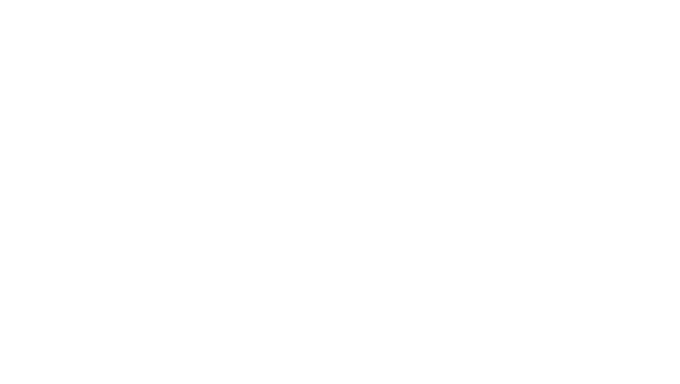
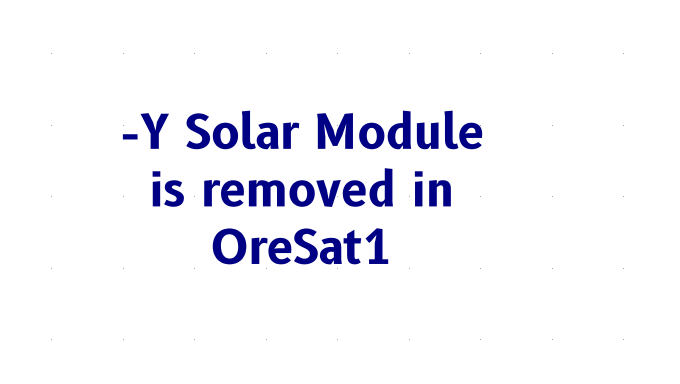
text: none -> -Y Solar Module (302, 129)
text: none -> is removed in (301, 187)
text: none -> OreSat1 (300, 246)

